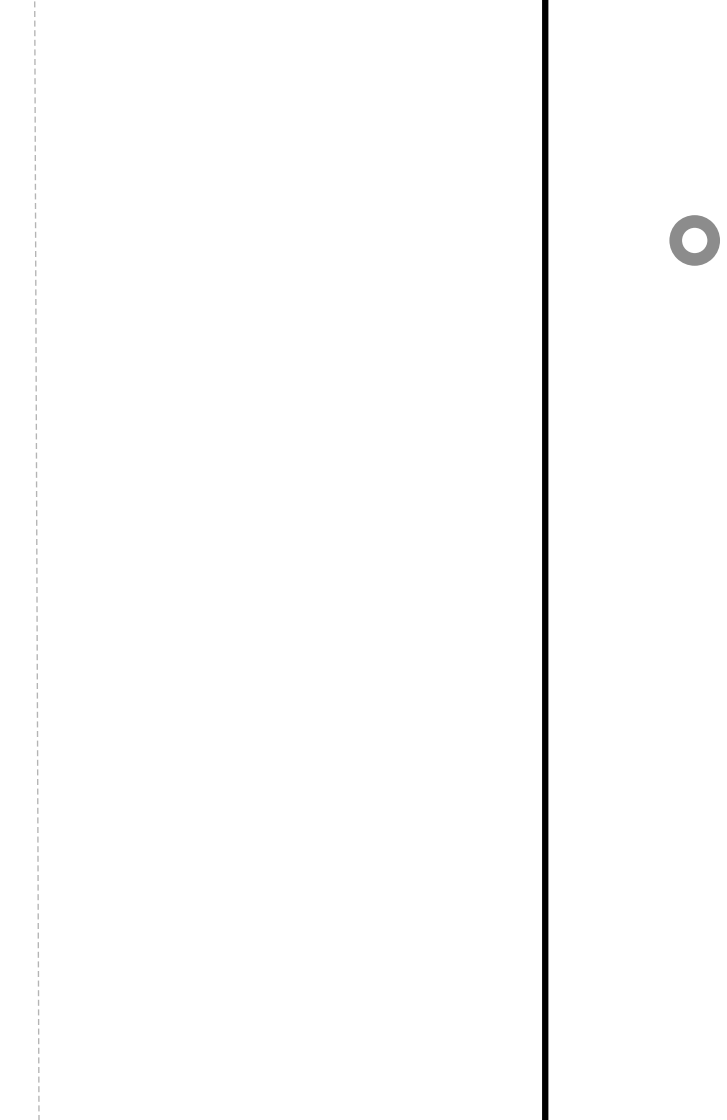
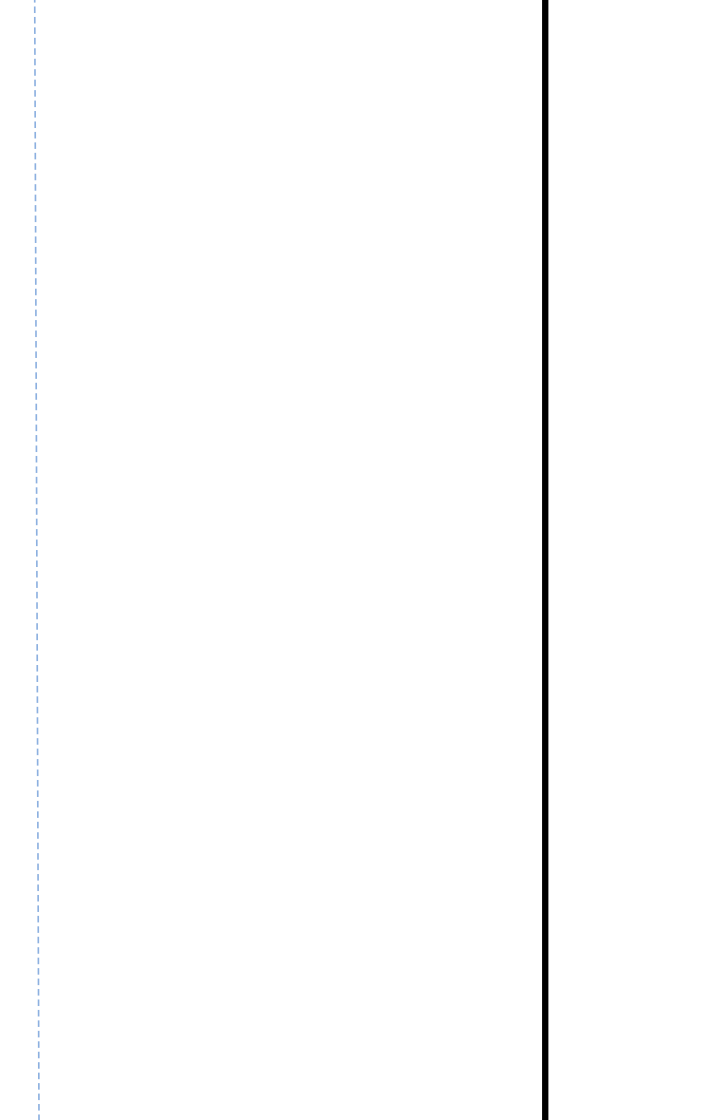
via: (694, 240) -> none

